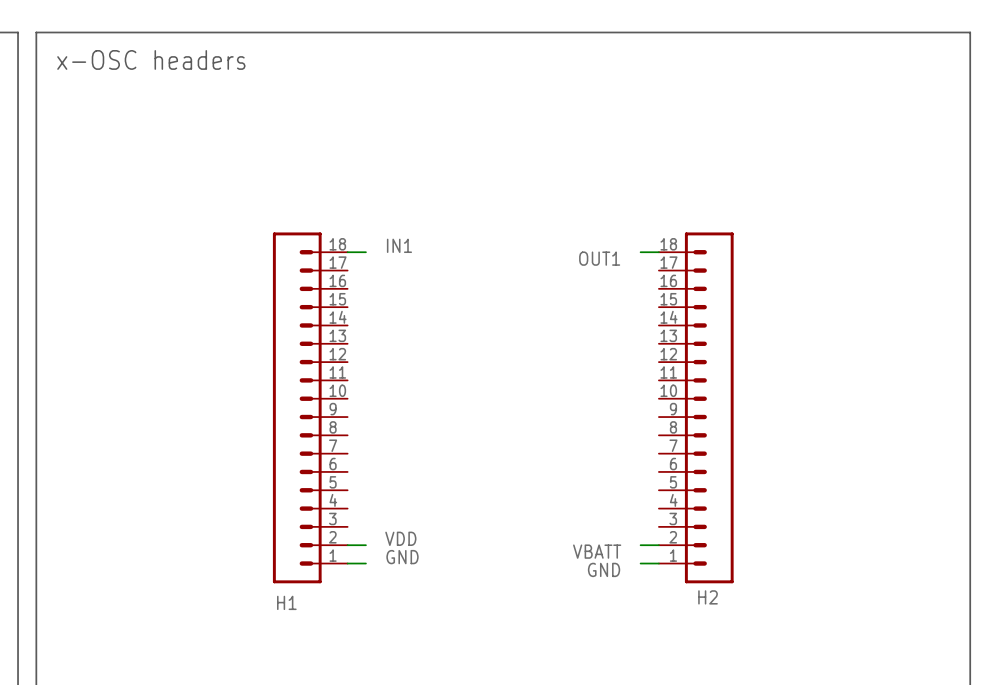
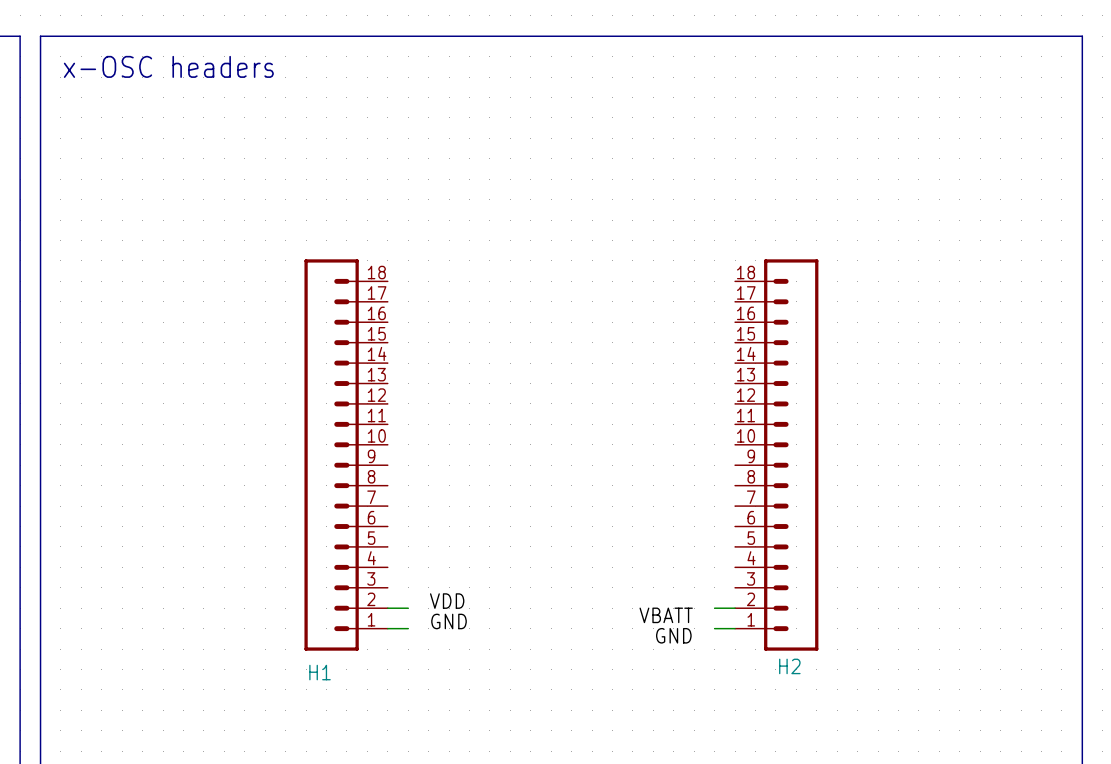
label: IN1 (399, 245) -> none
wire: (347, 252) (365, 252) -> none
wire: (640, 252) (658, 252) -> none
label: OUT1 (599, 258) -> none

